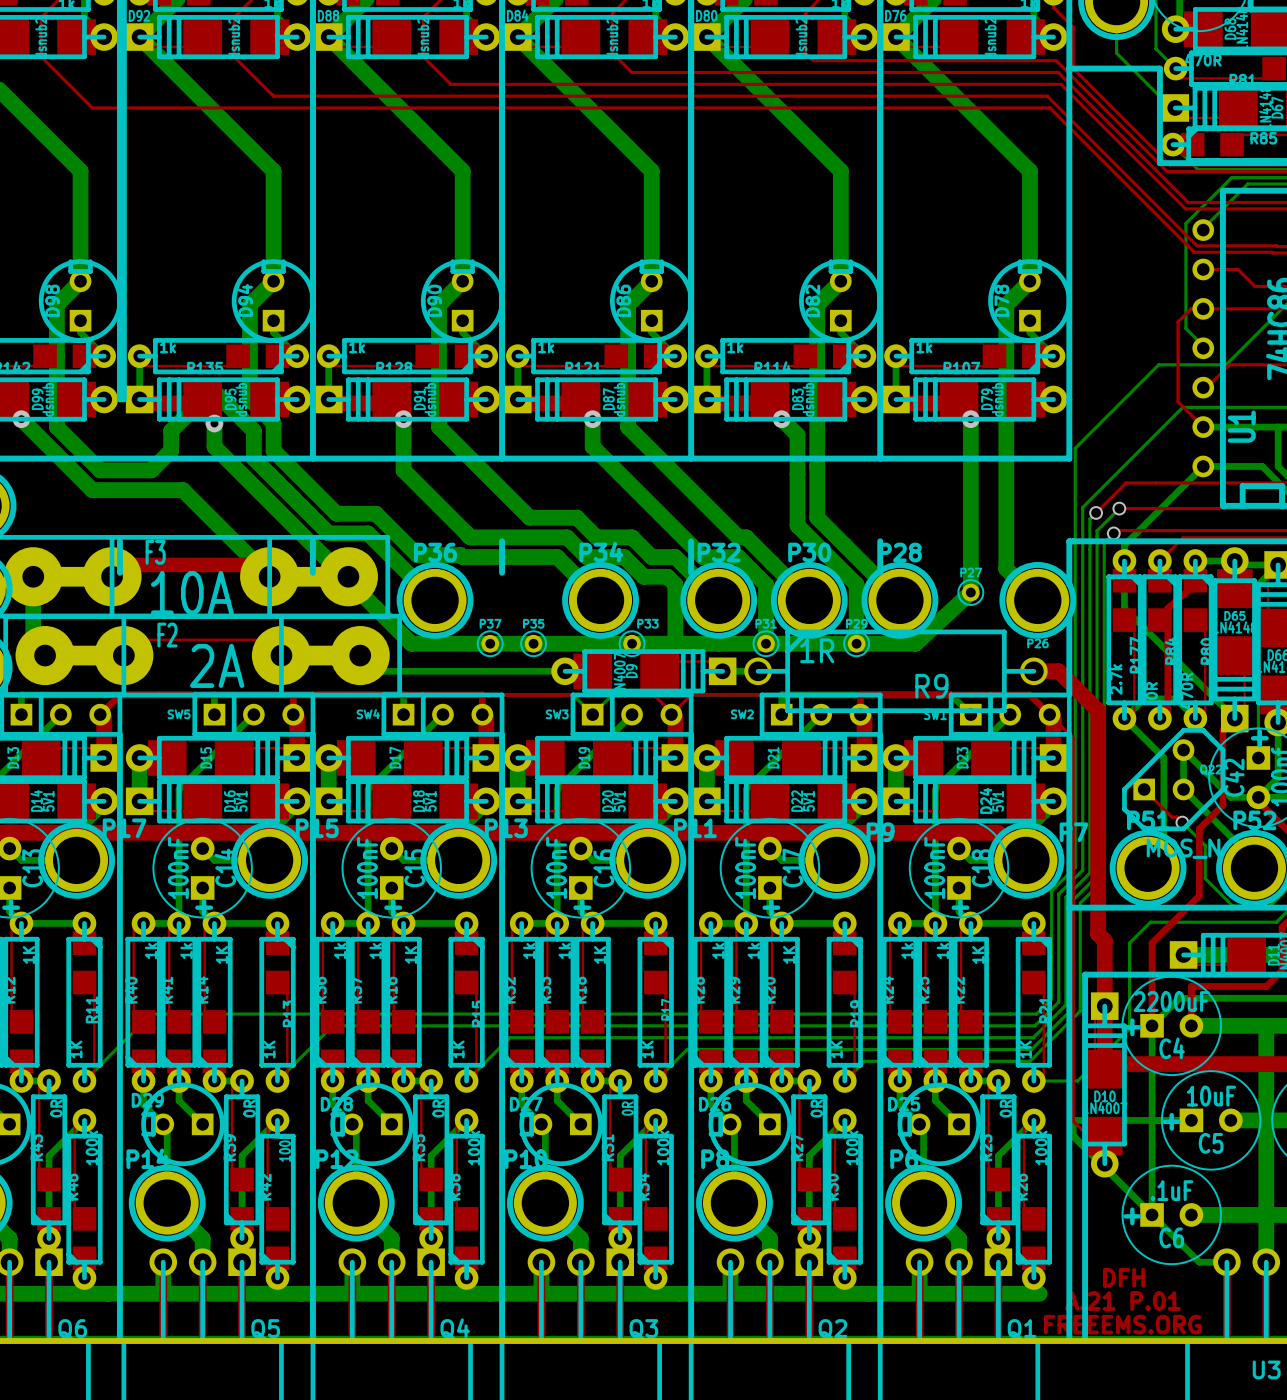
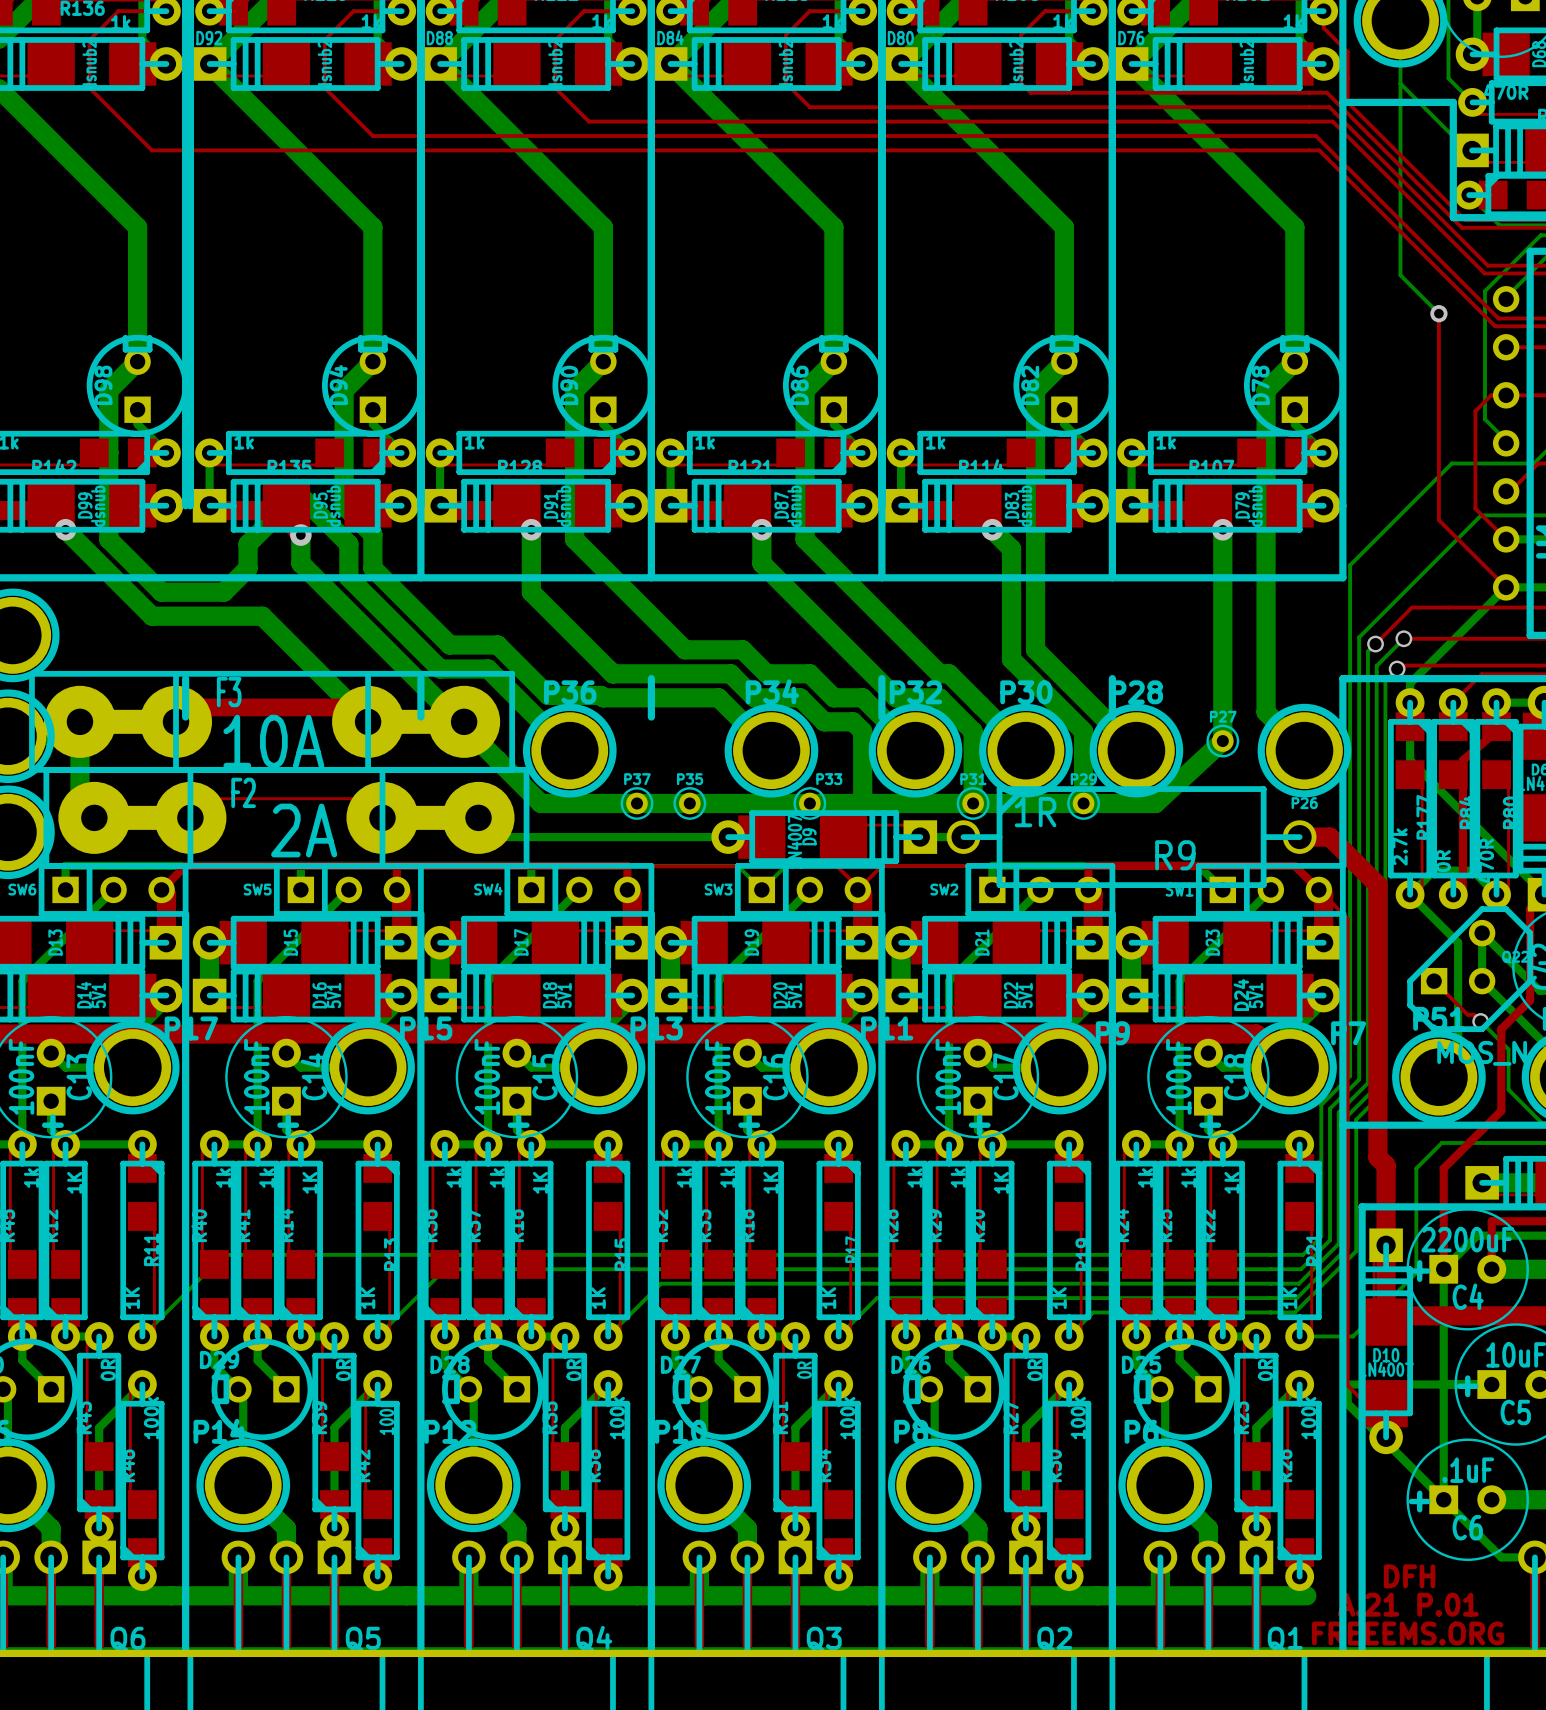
bottom track: none -> (1400, 83) (1400, 275) (1438, 313)
top track: none -> (1438, 313) (1438, 520) (1506, 587)
via: none -> (1438, 313)

